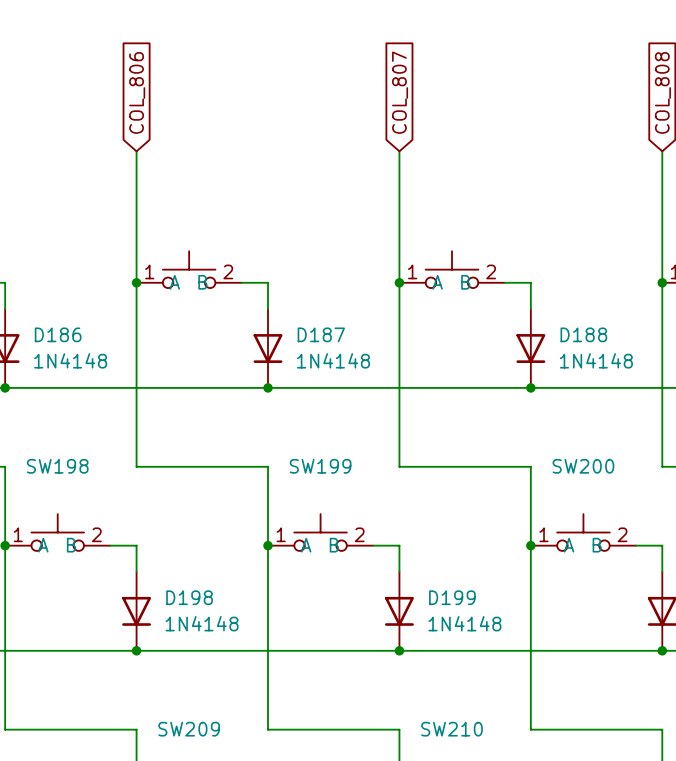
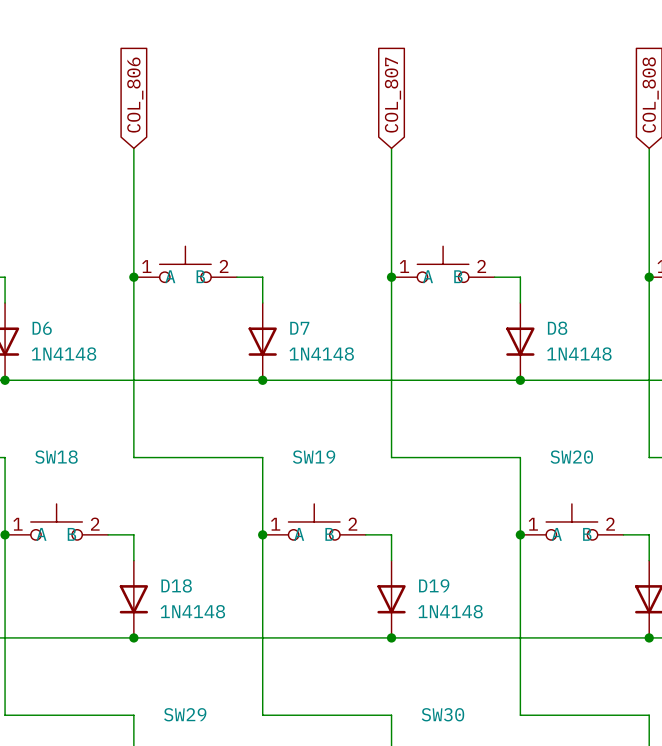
D186 name: D186 (58, 334) -> D6 (42, 328)
D187 name: D187 (321, 334) -> D7 (299, 328)
D188 name: D188 (583, 334) -> D8 (557, 328)
SW198 name: SW198 (57, 466) -> SW18 (56, 457)
SW199 name: SW199 (320, 466) -> SW19 (314, 457)
SW200 name: SW200 (583, 466) -> SW20 (571, 457)
D198 name: D198 (189, 597) -> D18 (176, 585)
D199 name: D199 (452, 597) -> D19 (434, 585)
SW209 name: SW209 (189, 729) -> SW29 (185, 714)
SW210 name: SW210 (452, 729) -> SW30 (442, 714)

